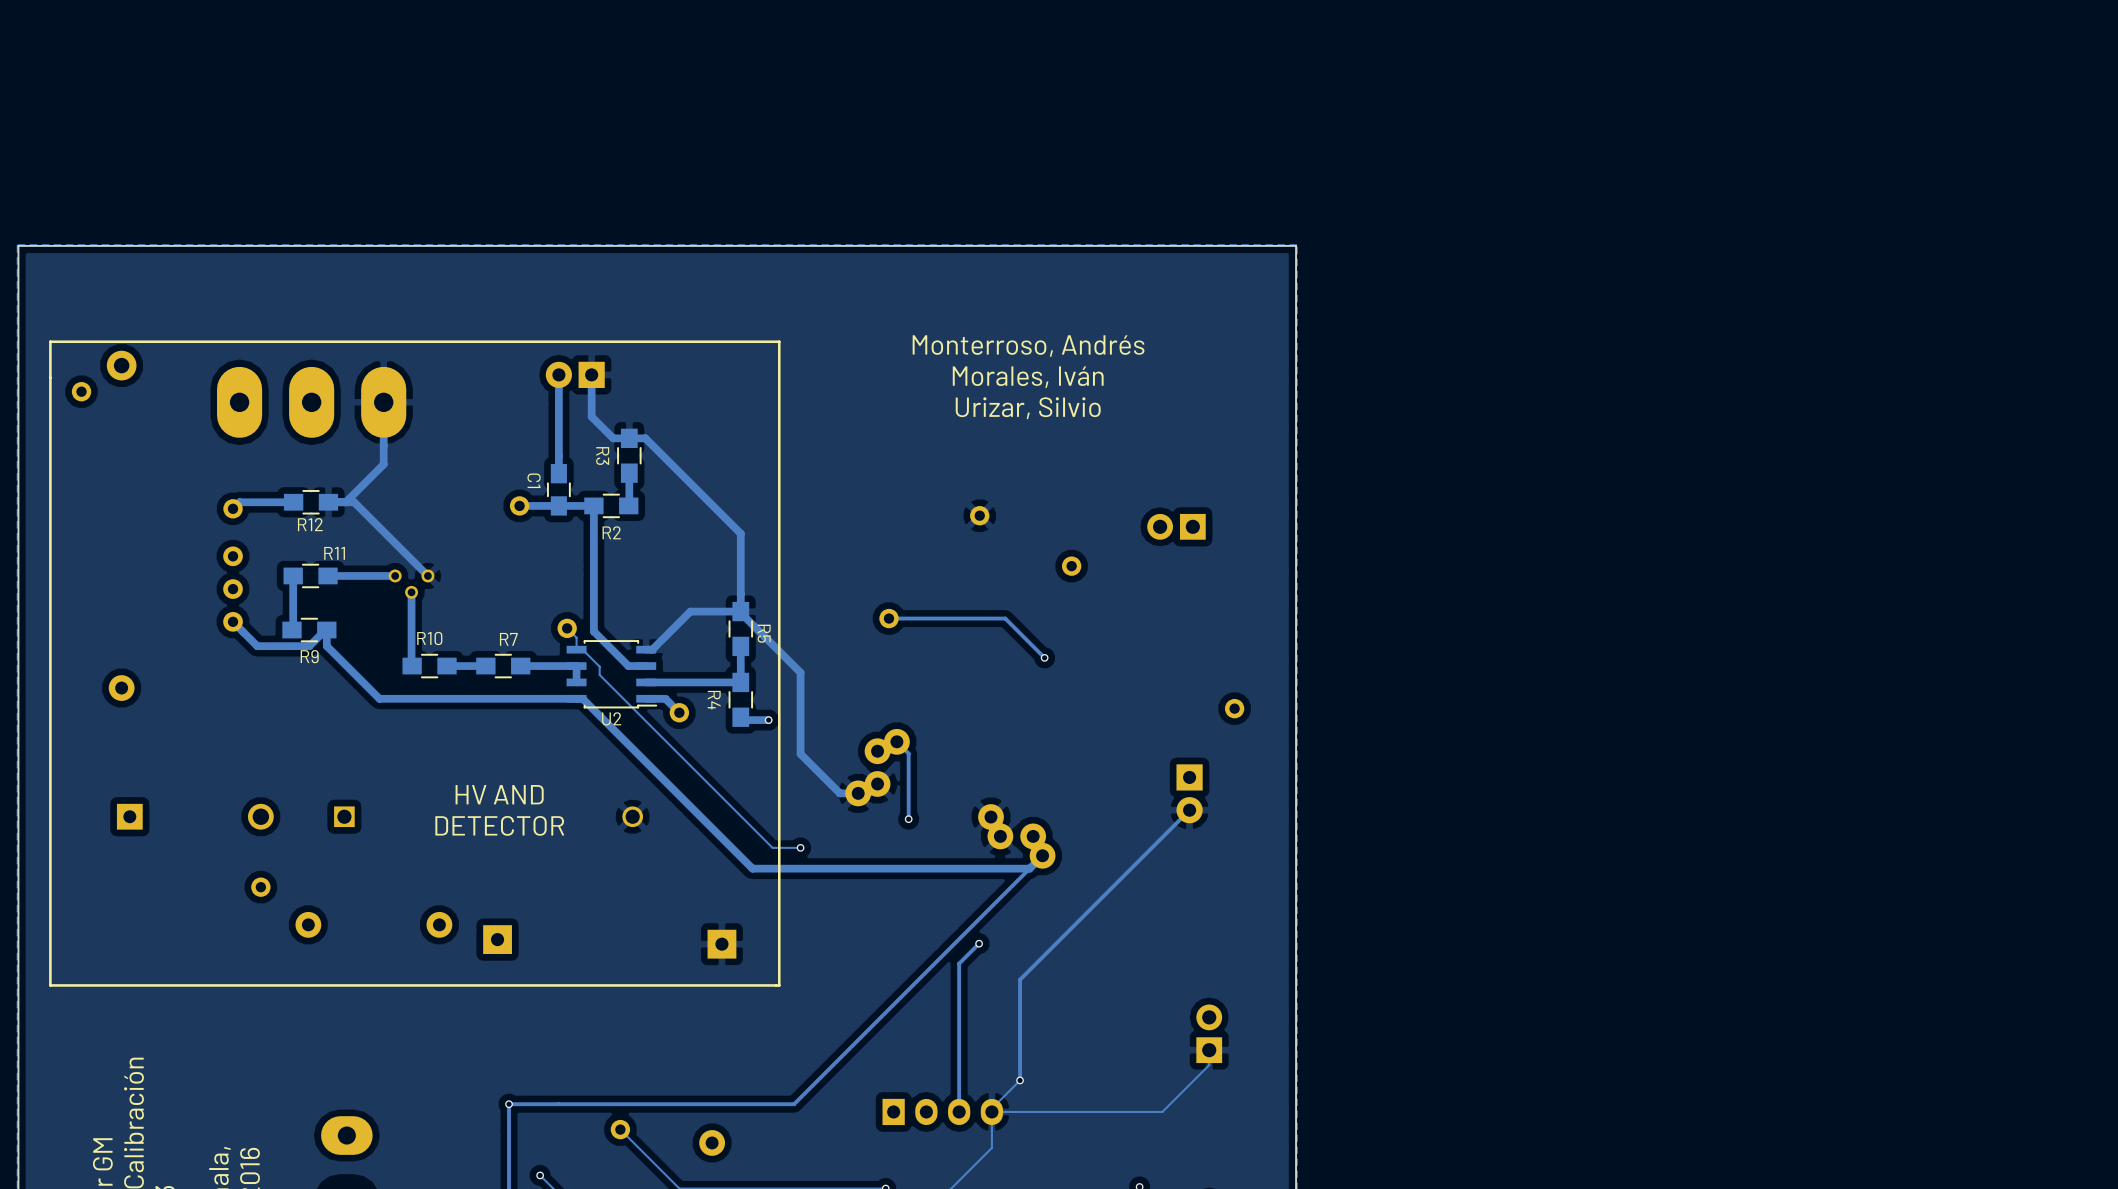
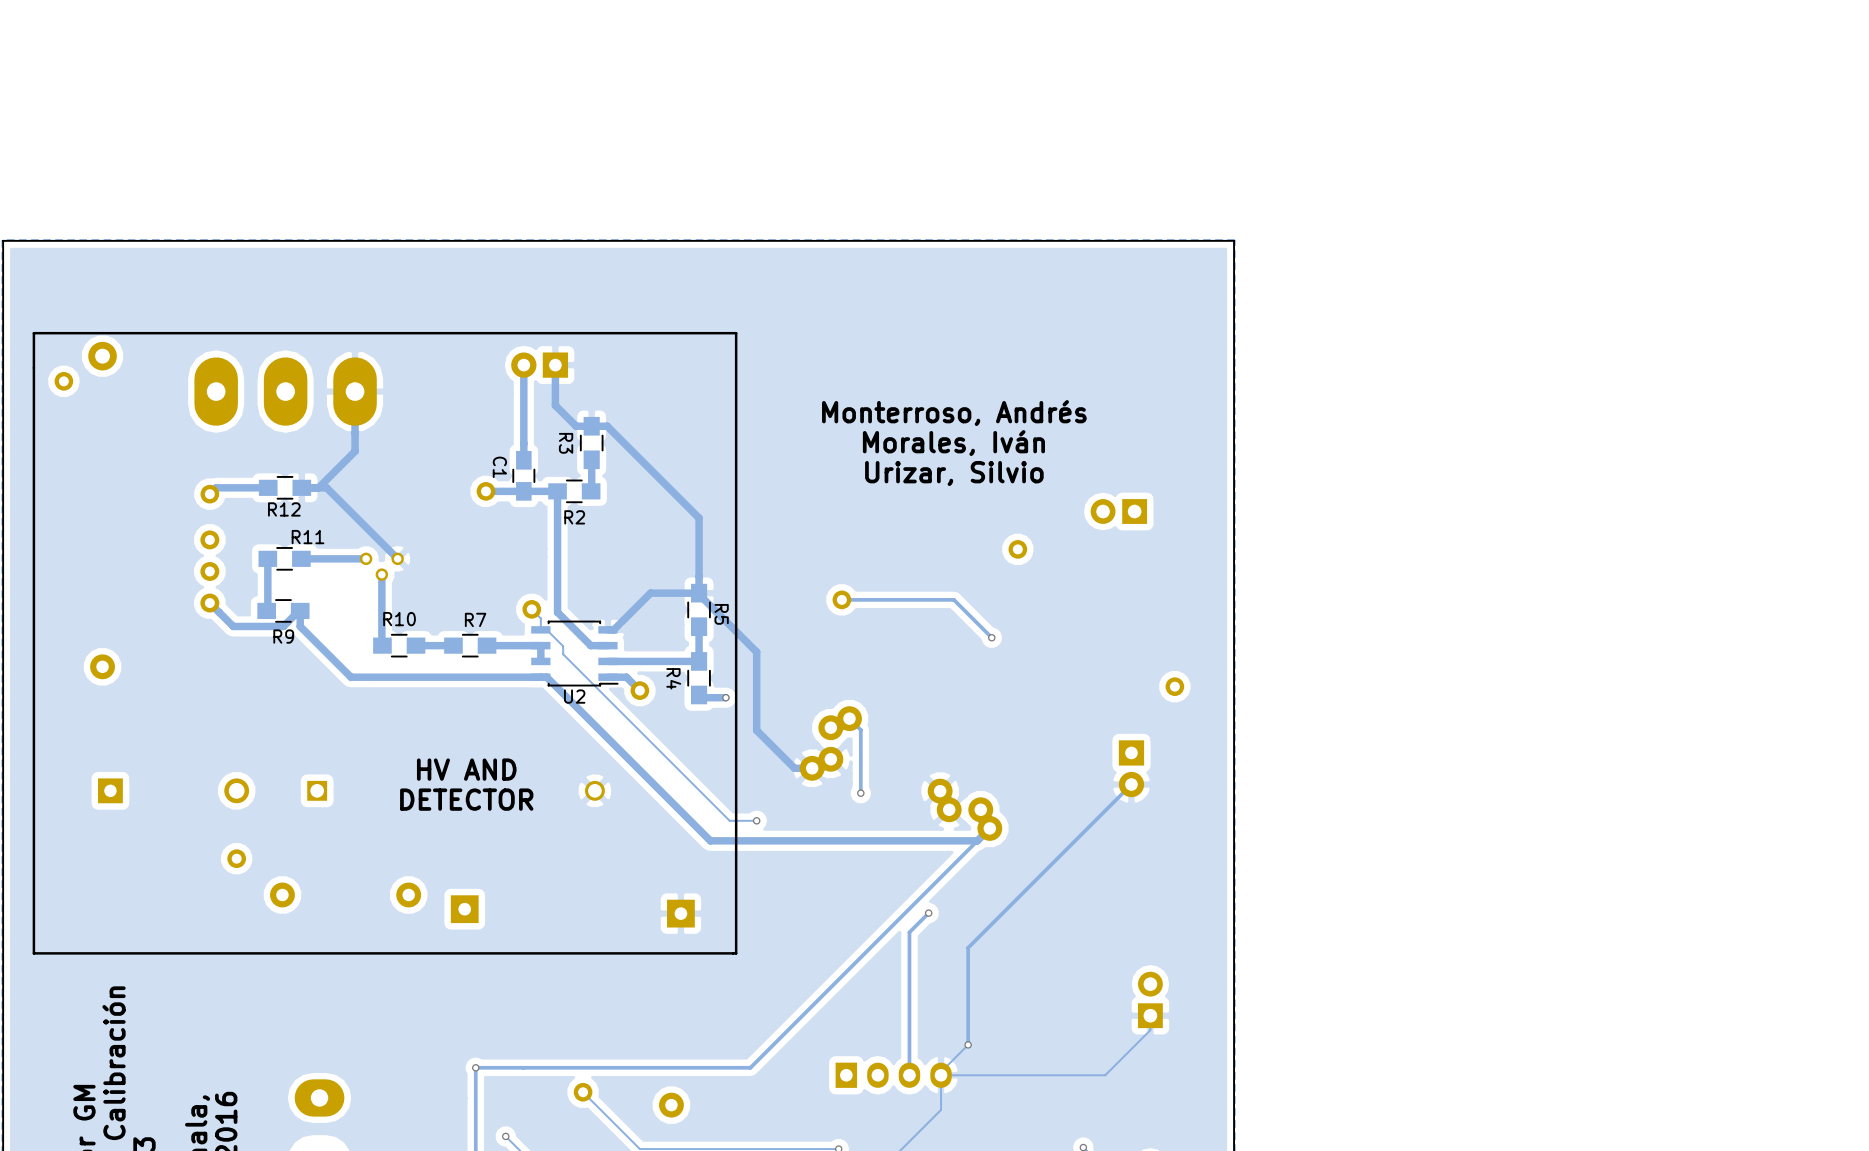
text position: Monterroso, Andrés (1028, 346) -> Monterroso, Andrés (954, 413)
text position: Morales, Iván (1028, 377) -> Morales, Iván (953, 443)
text position: Urizar, Silvio (1028, 408) -> Urizar, Silvio (954, 473)
part: (979, 515) -> none

